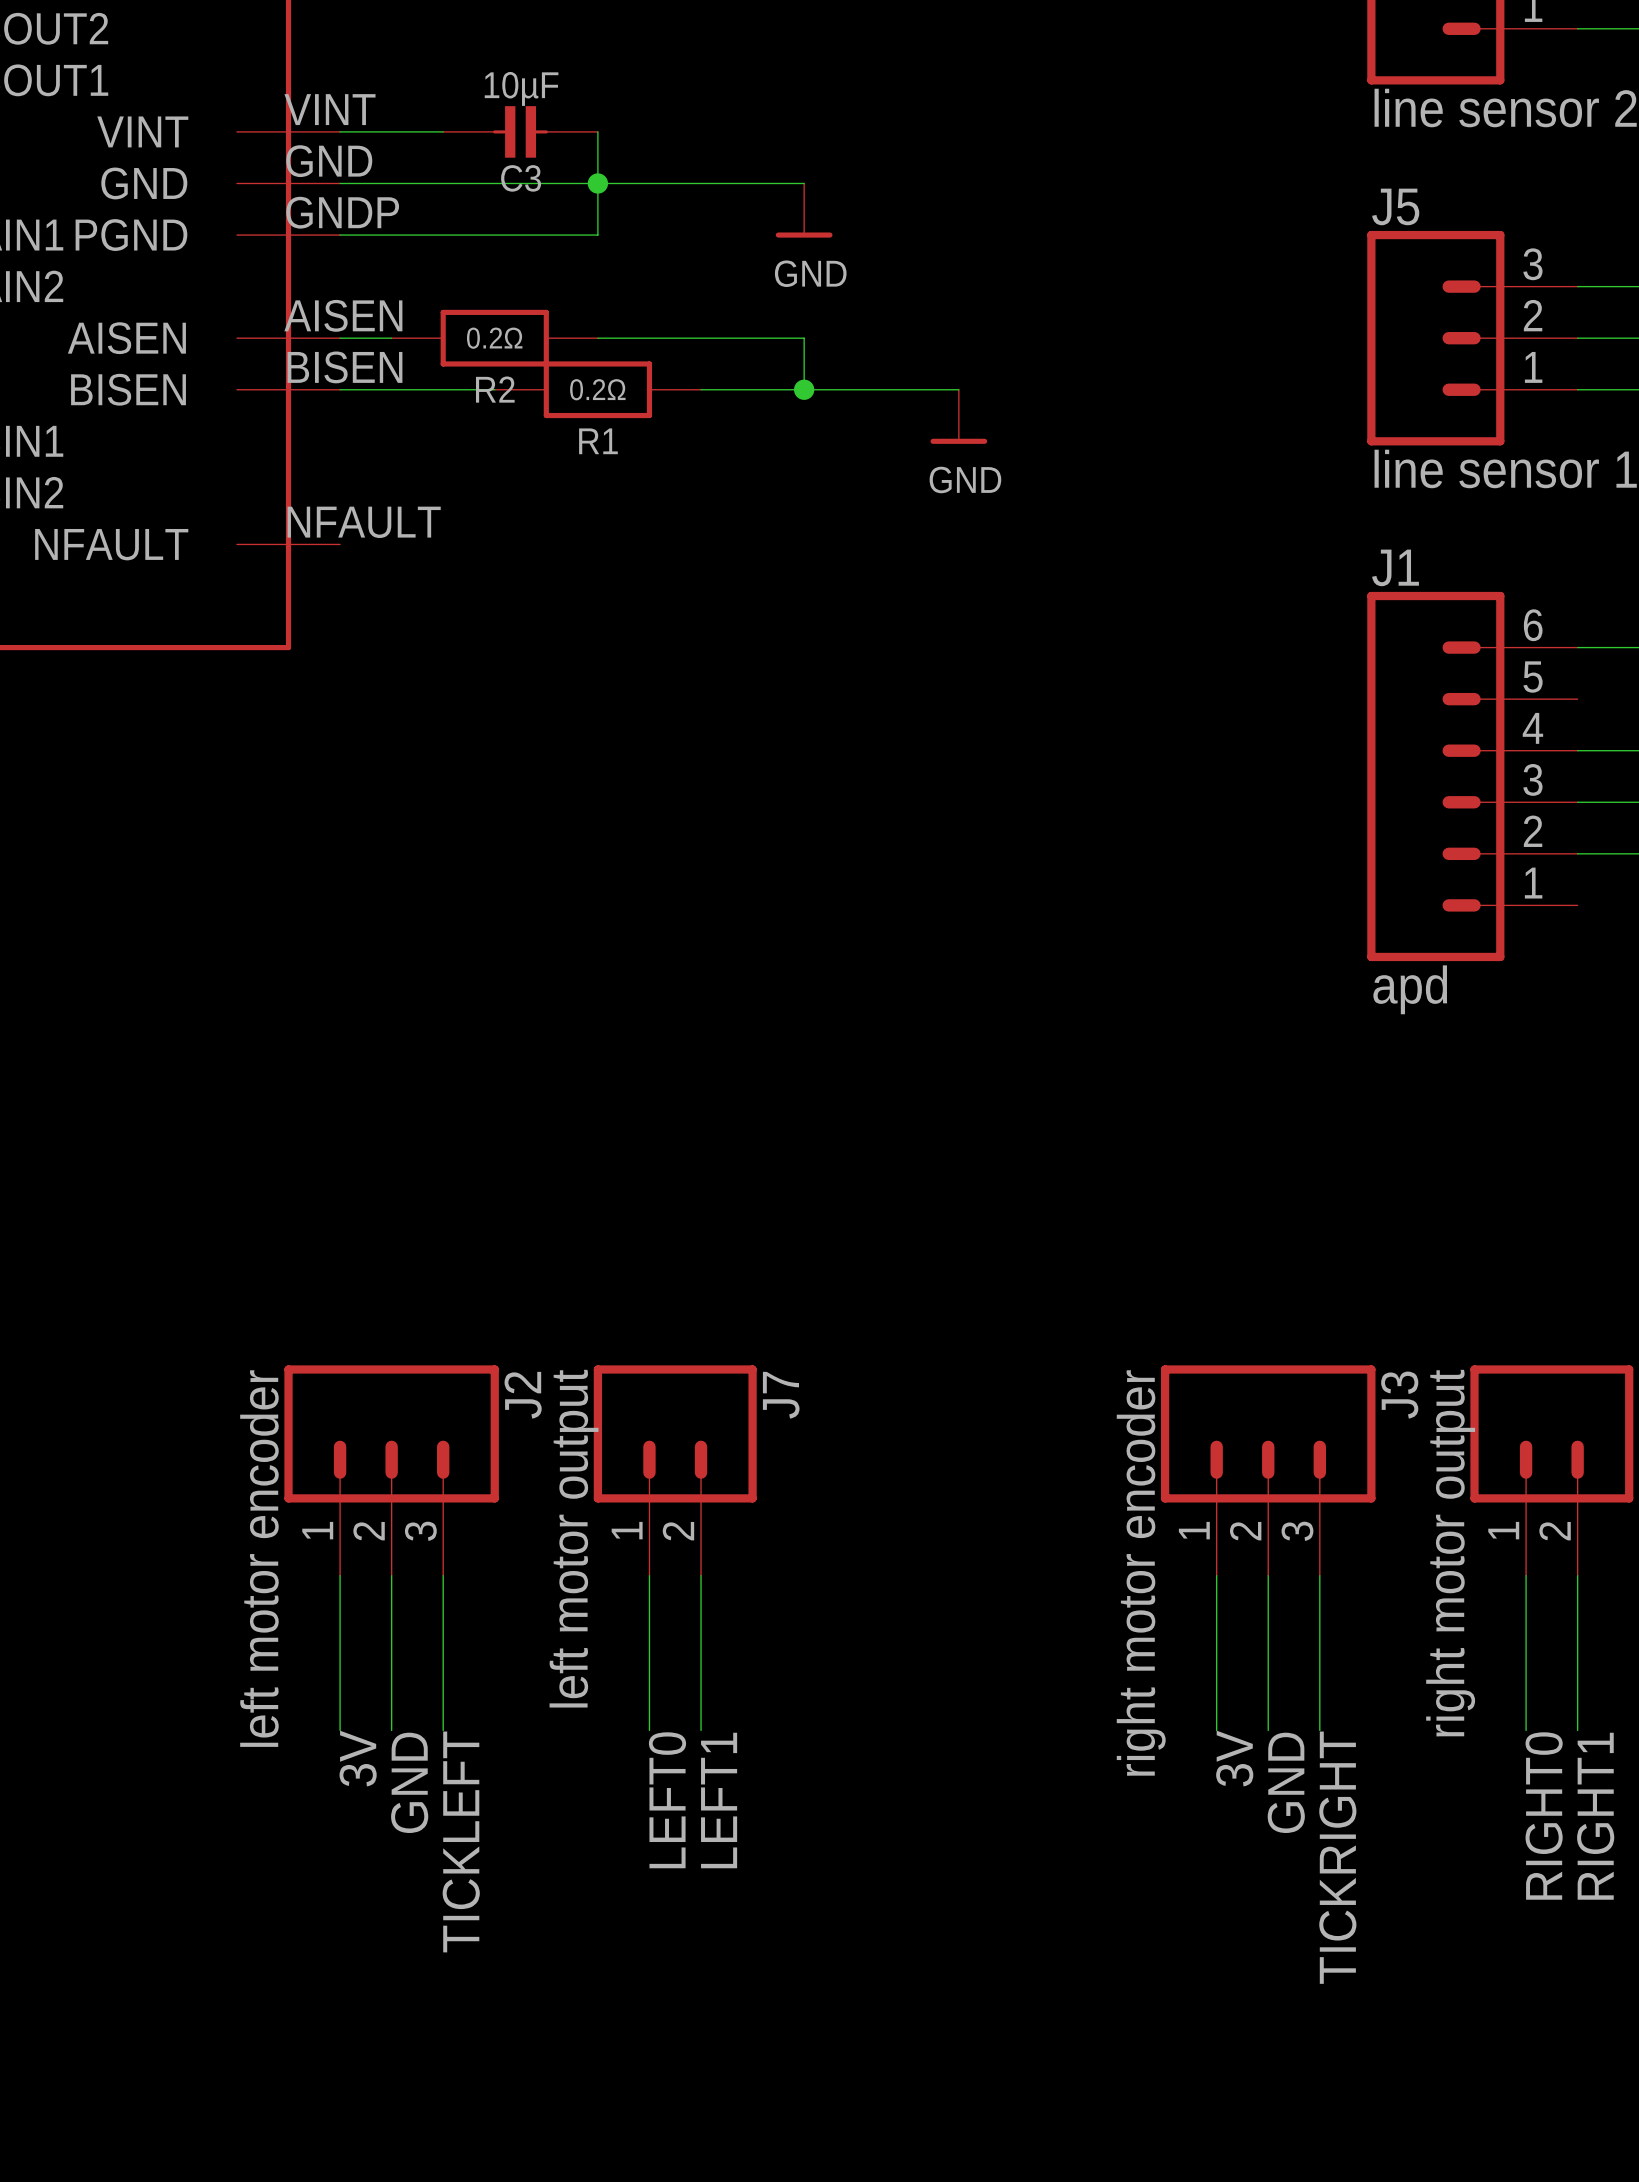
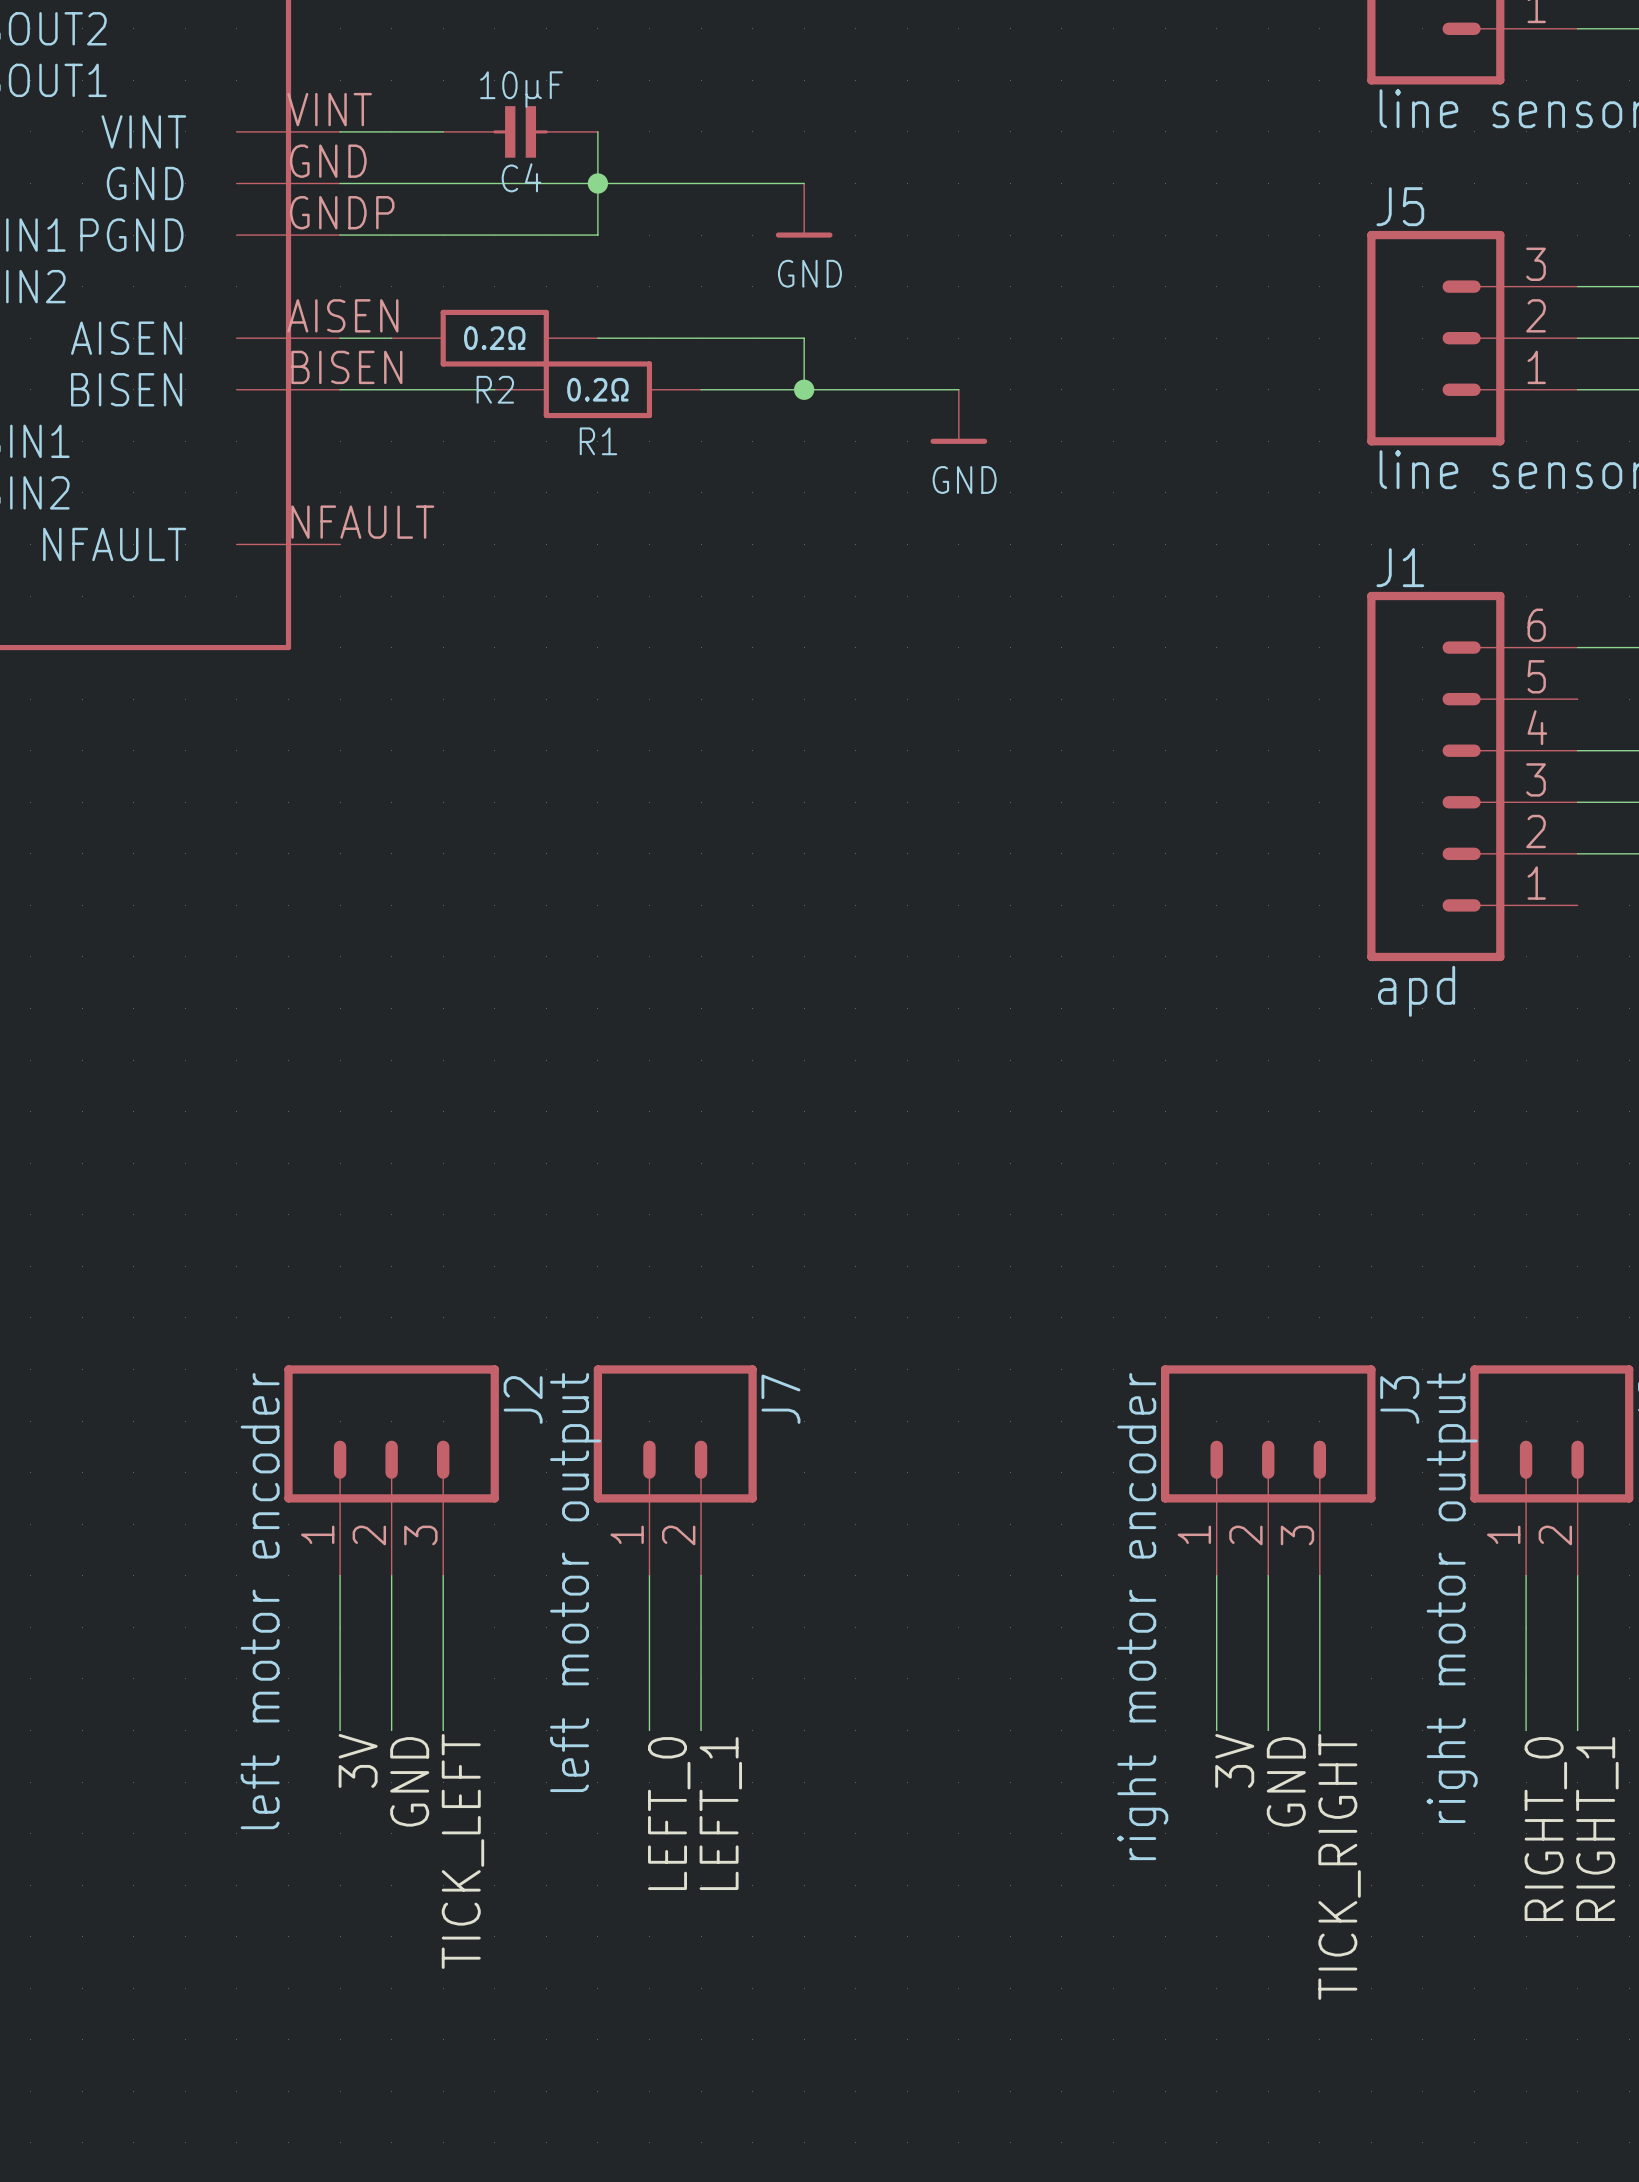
C3 name: C3 (521, 178) -> C4 (521, 177)
label: LEFT0 (667, 1800) -> LEFT_0 (669, 1813)
label: LEFT1 (719, 1800) -> LEFT_1 (720, 1813)
label: RIGHT0 (1544, 1816) -> RIGHT_0 (1545, 1829)
label: RIGHT1 (1595, 1816) -> RIGHT_1 (1597, 1829)
label: TICKLEFT (461, 1841) -> TICK_LEFT (462, 1851)
label: TICKRIGHT (1337, 1857) -> TICK_RIGHT (1339, 1866)

